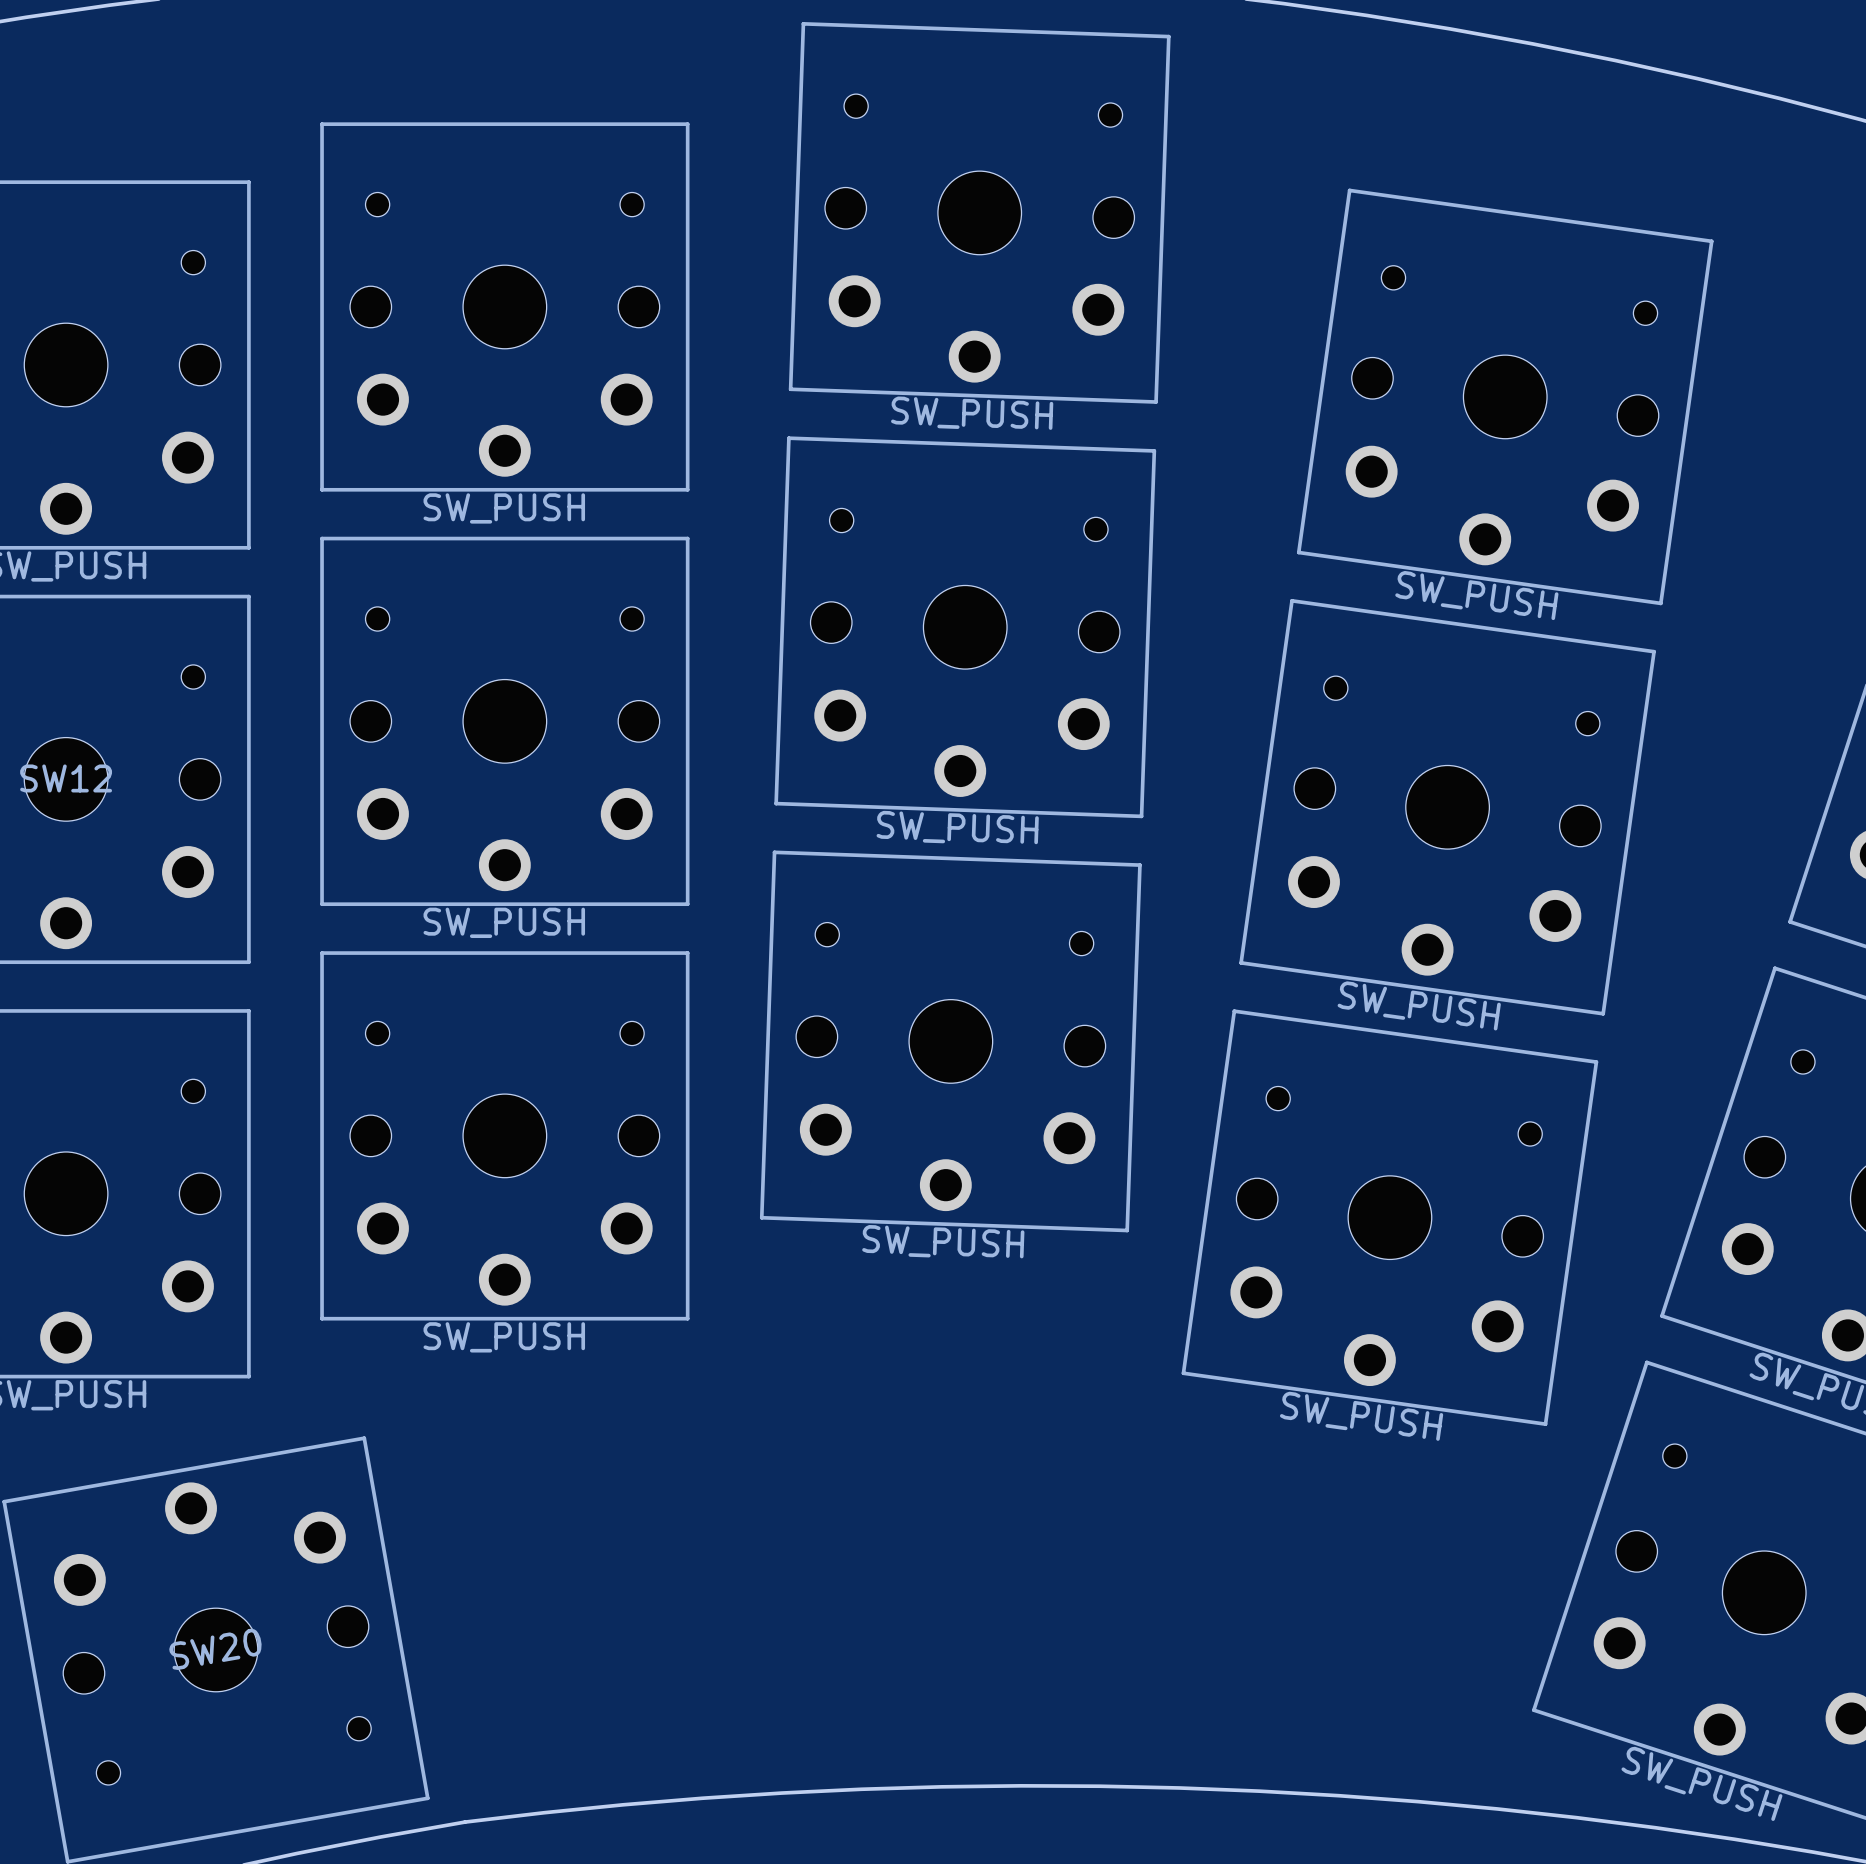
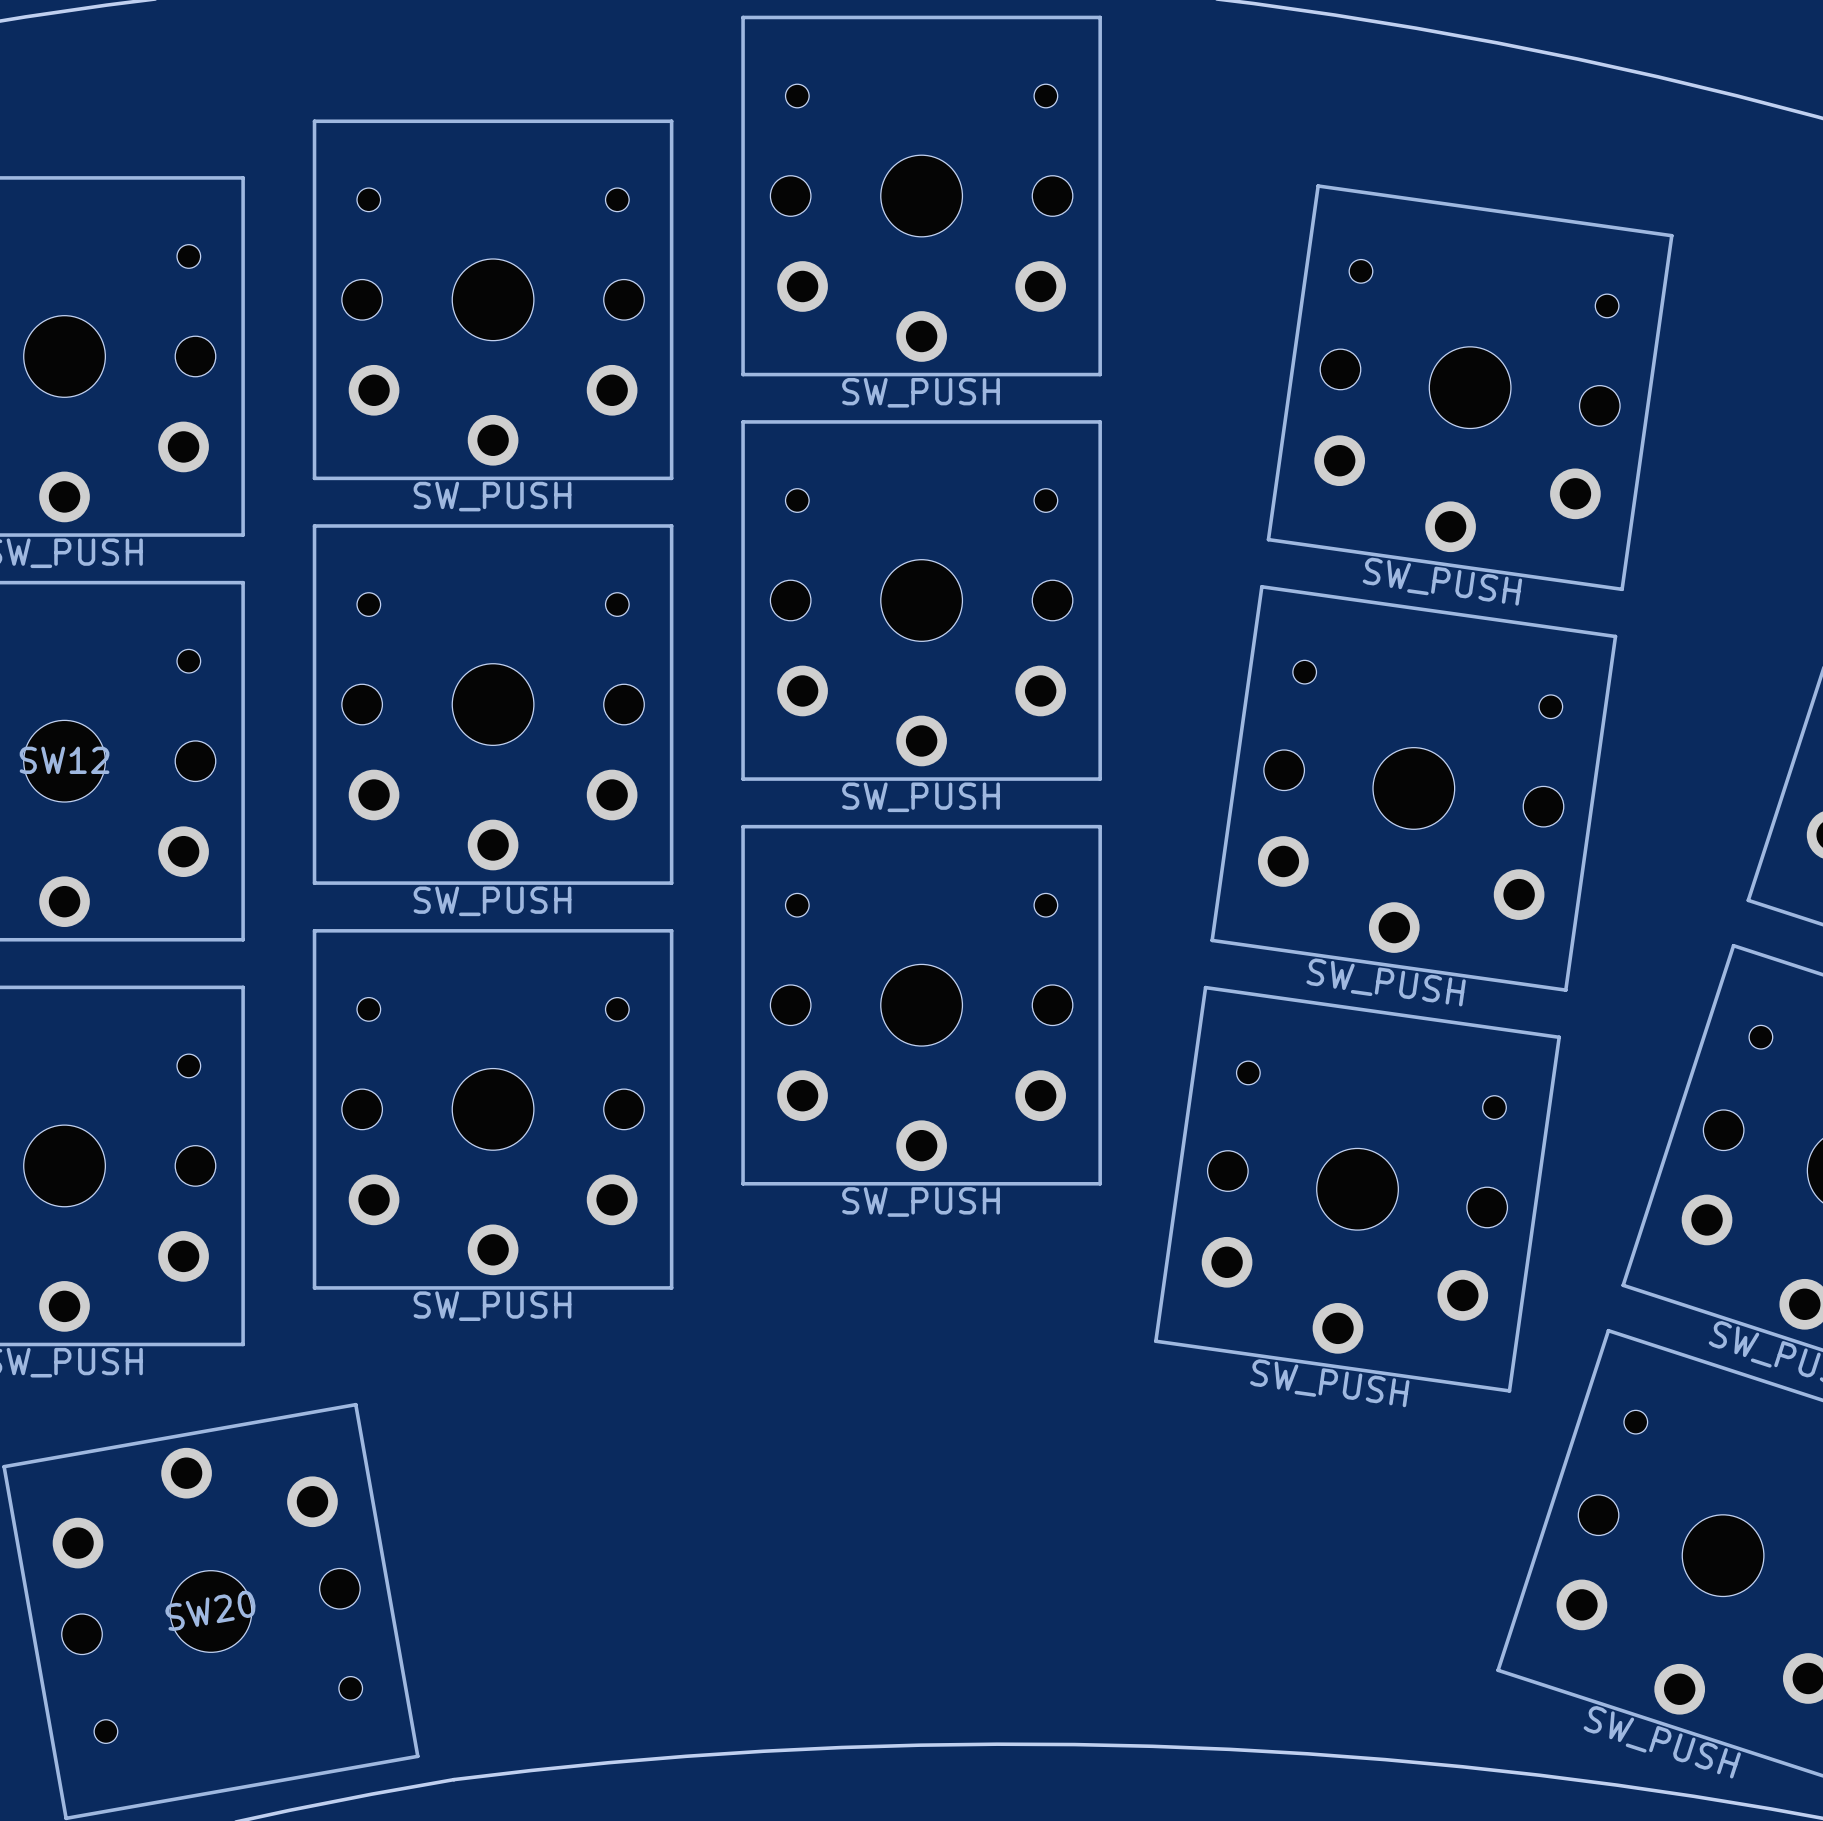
part: none -> SW_PUSH (921, 196)
part: SW_PUSH (979, 212) -> none
part: none -> SW_PUSH (921, 600)
part: SW_PUSH (965, 627) -> none
part rotation: 0° (950, 1041) -> 2° counterclockwise (921, 1005)

